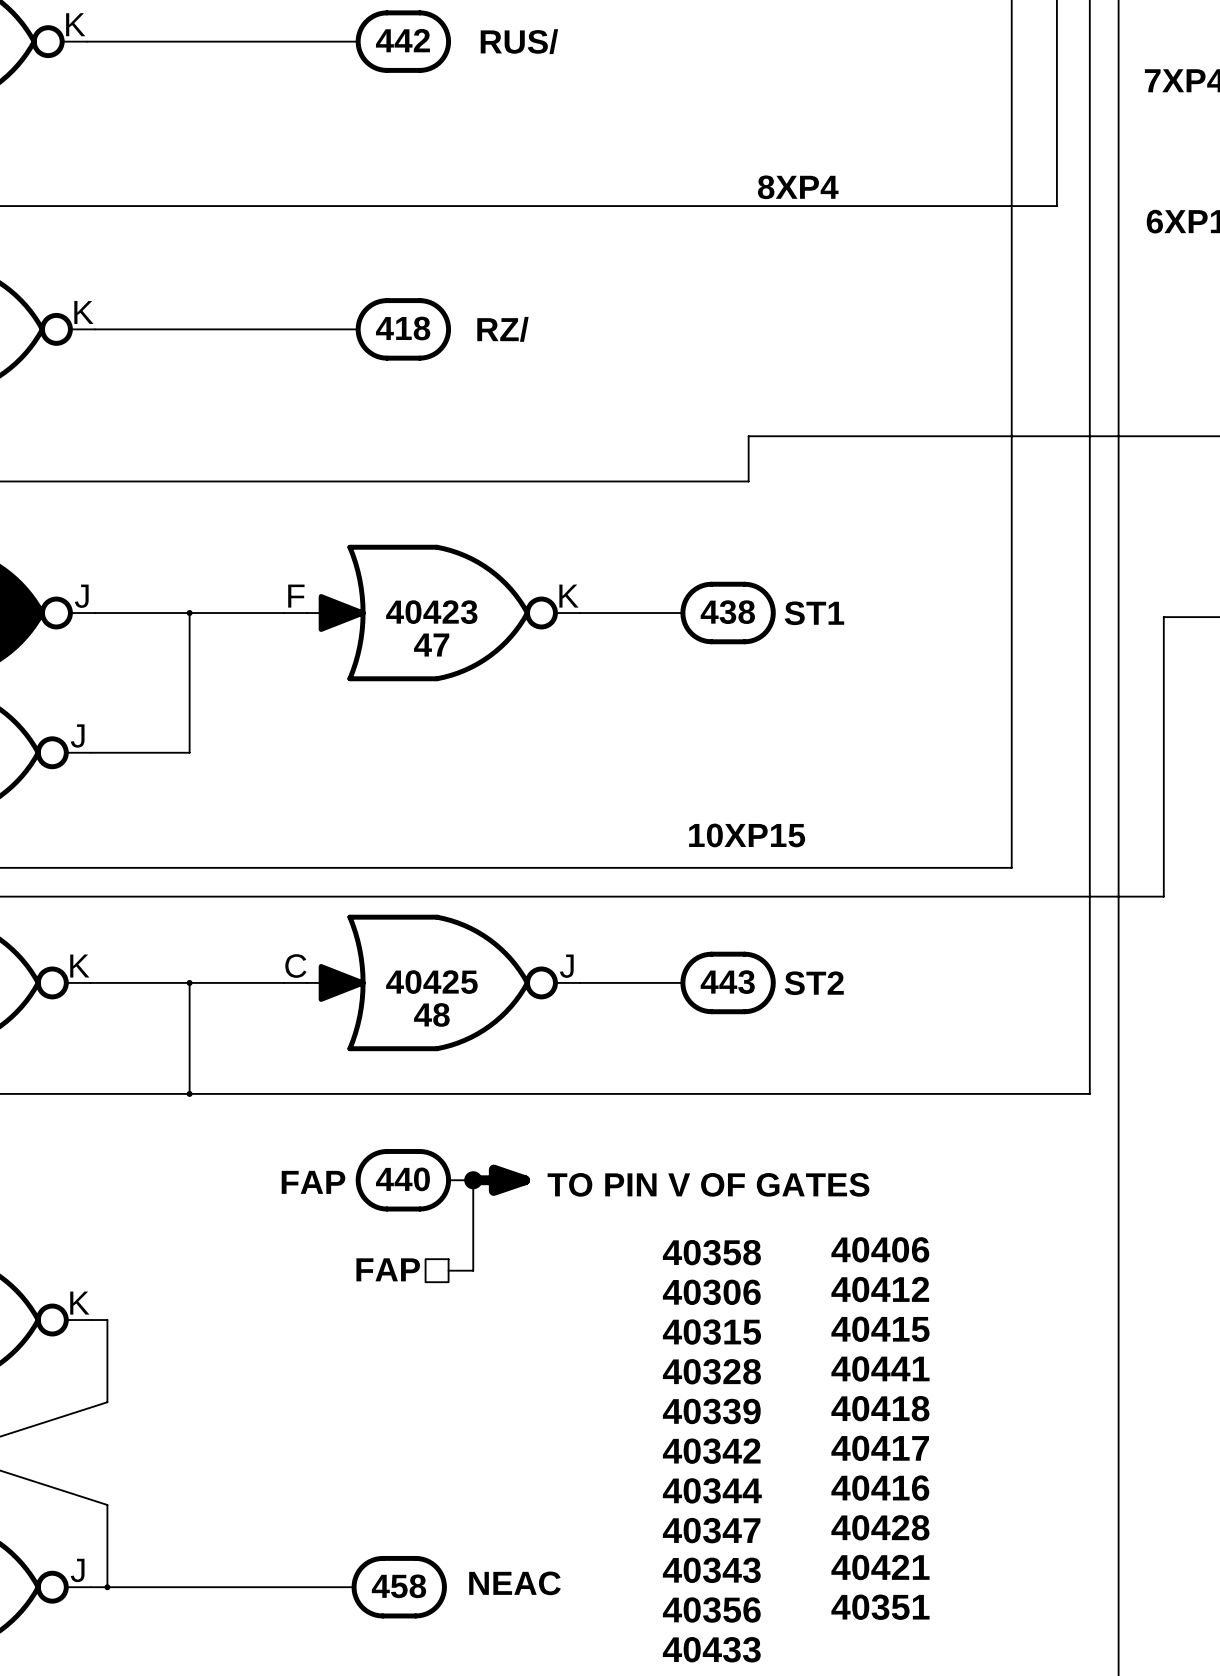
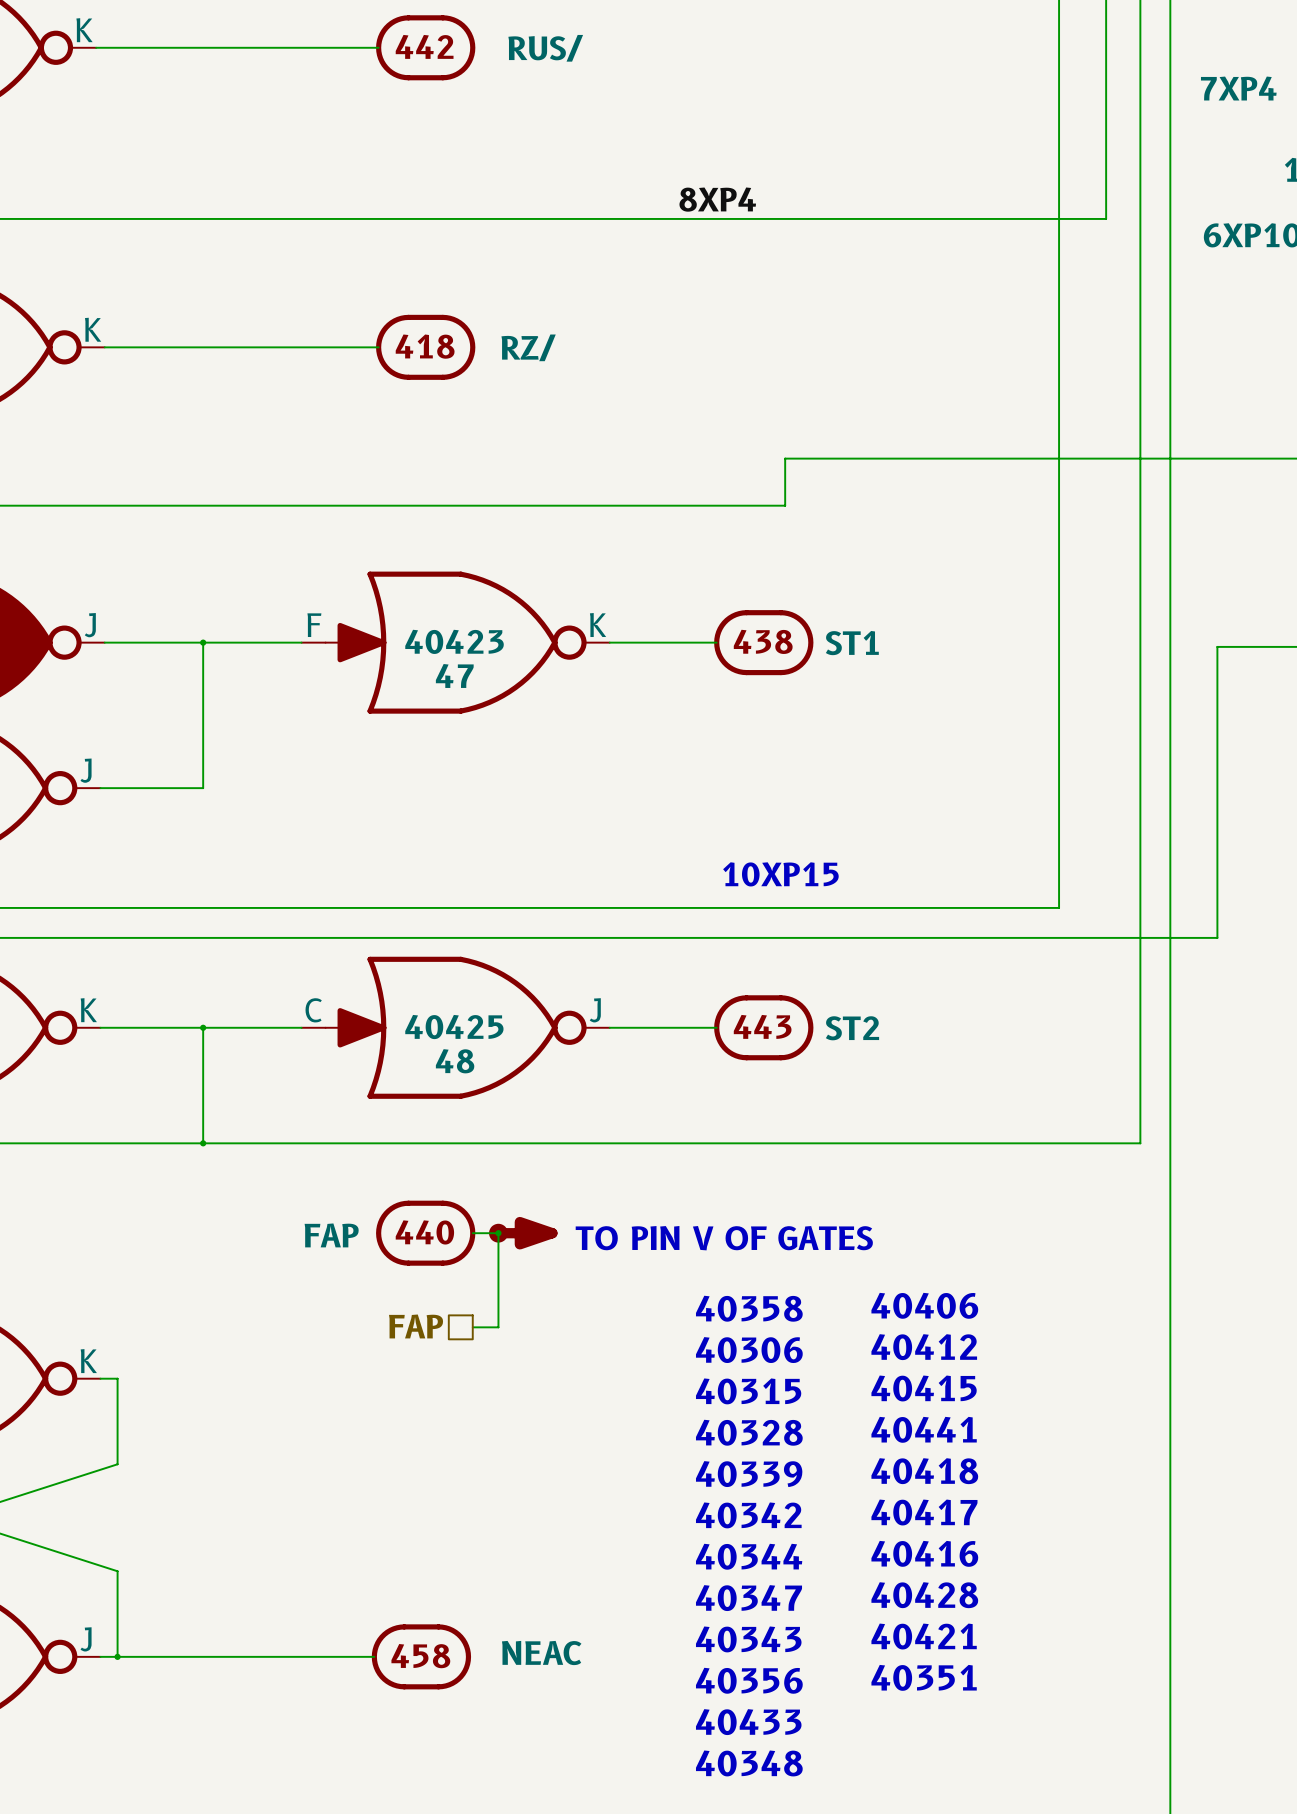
label position: 8XP4 (798, 187) -> 8XP4 (717, 199)

